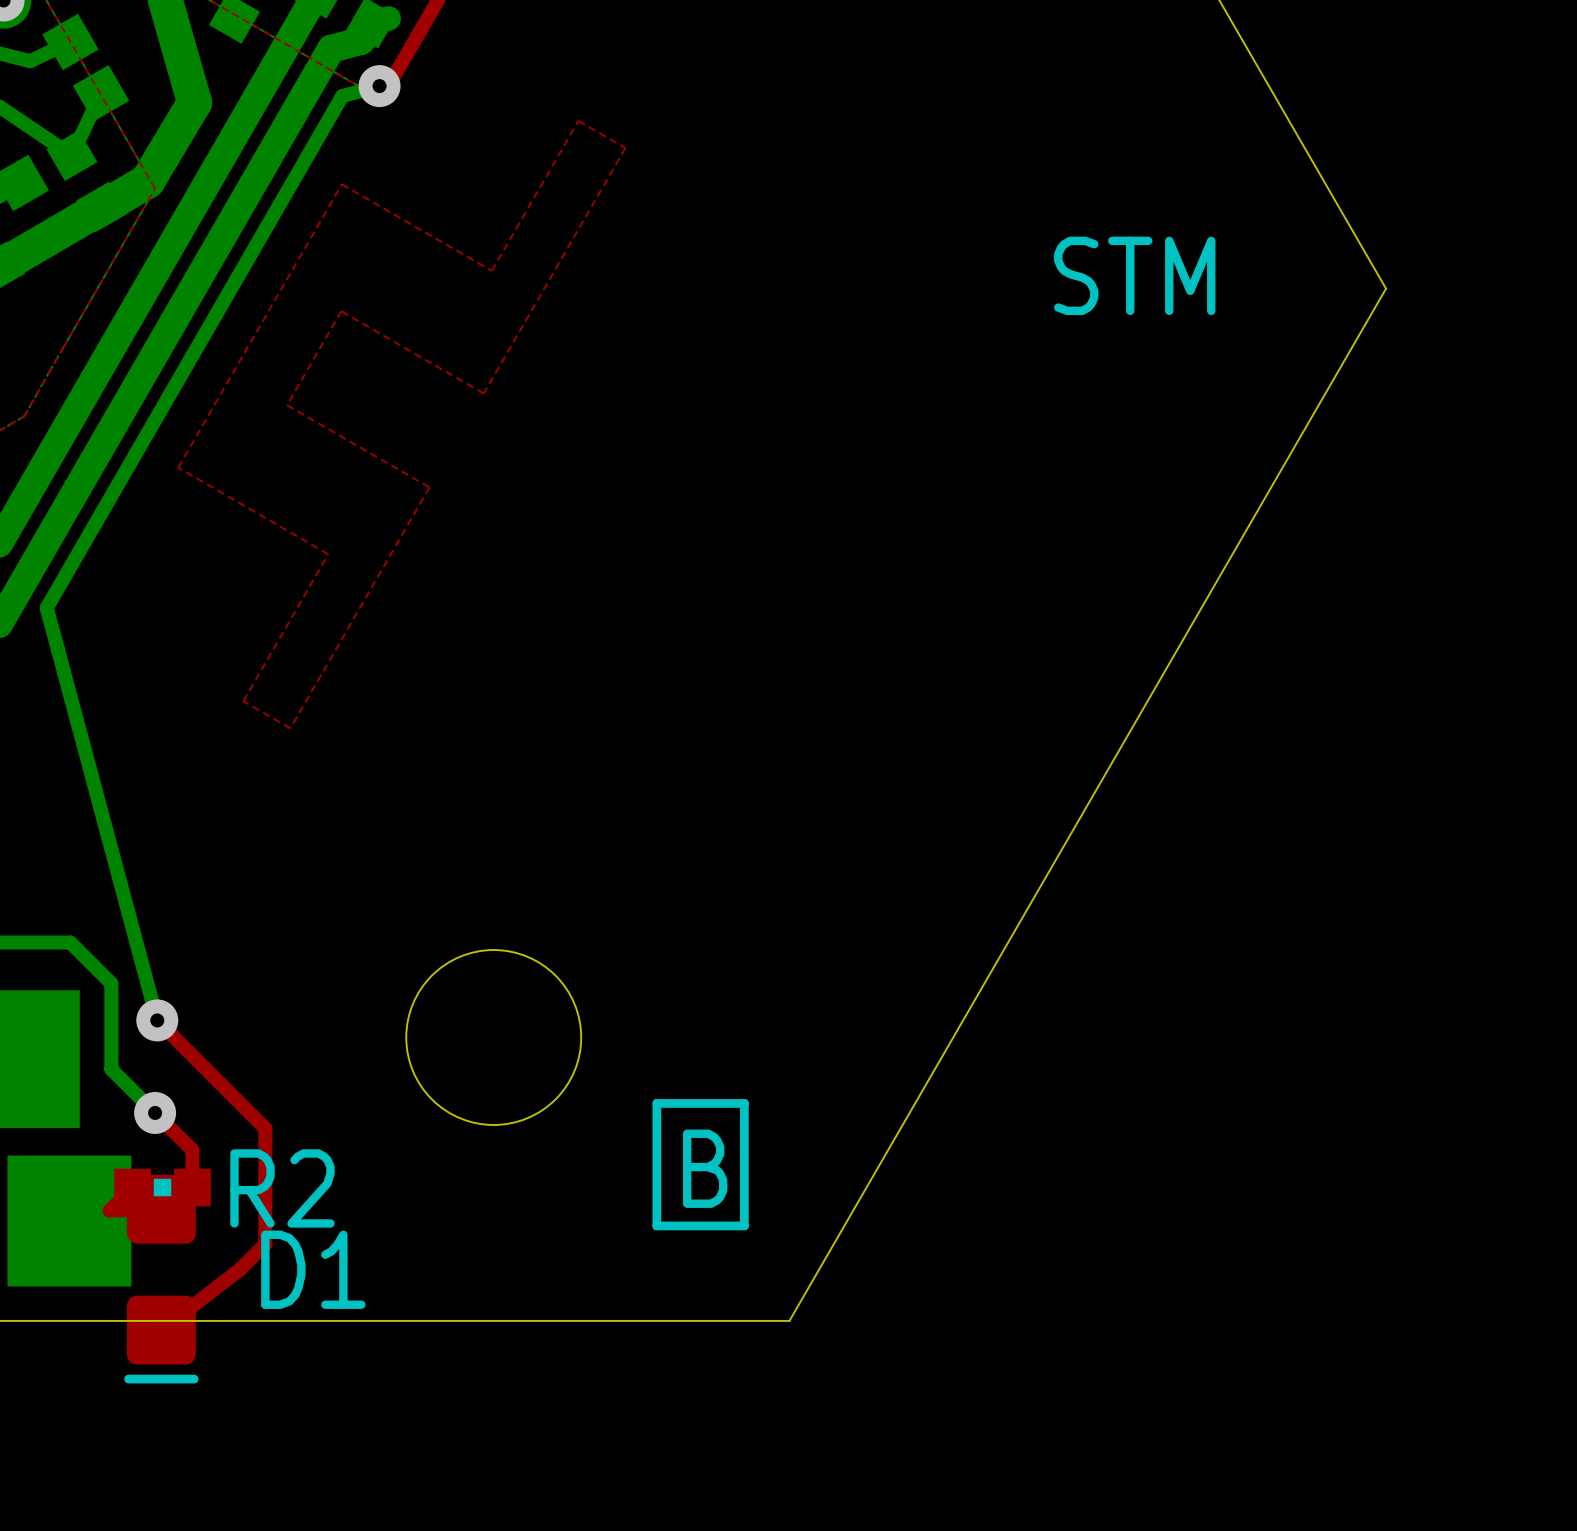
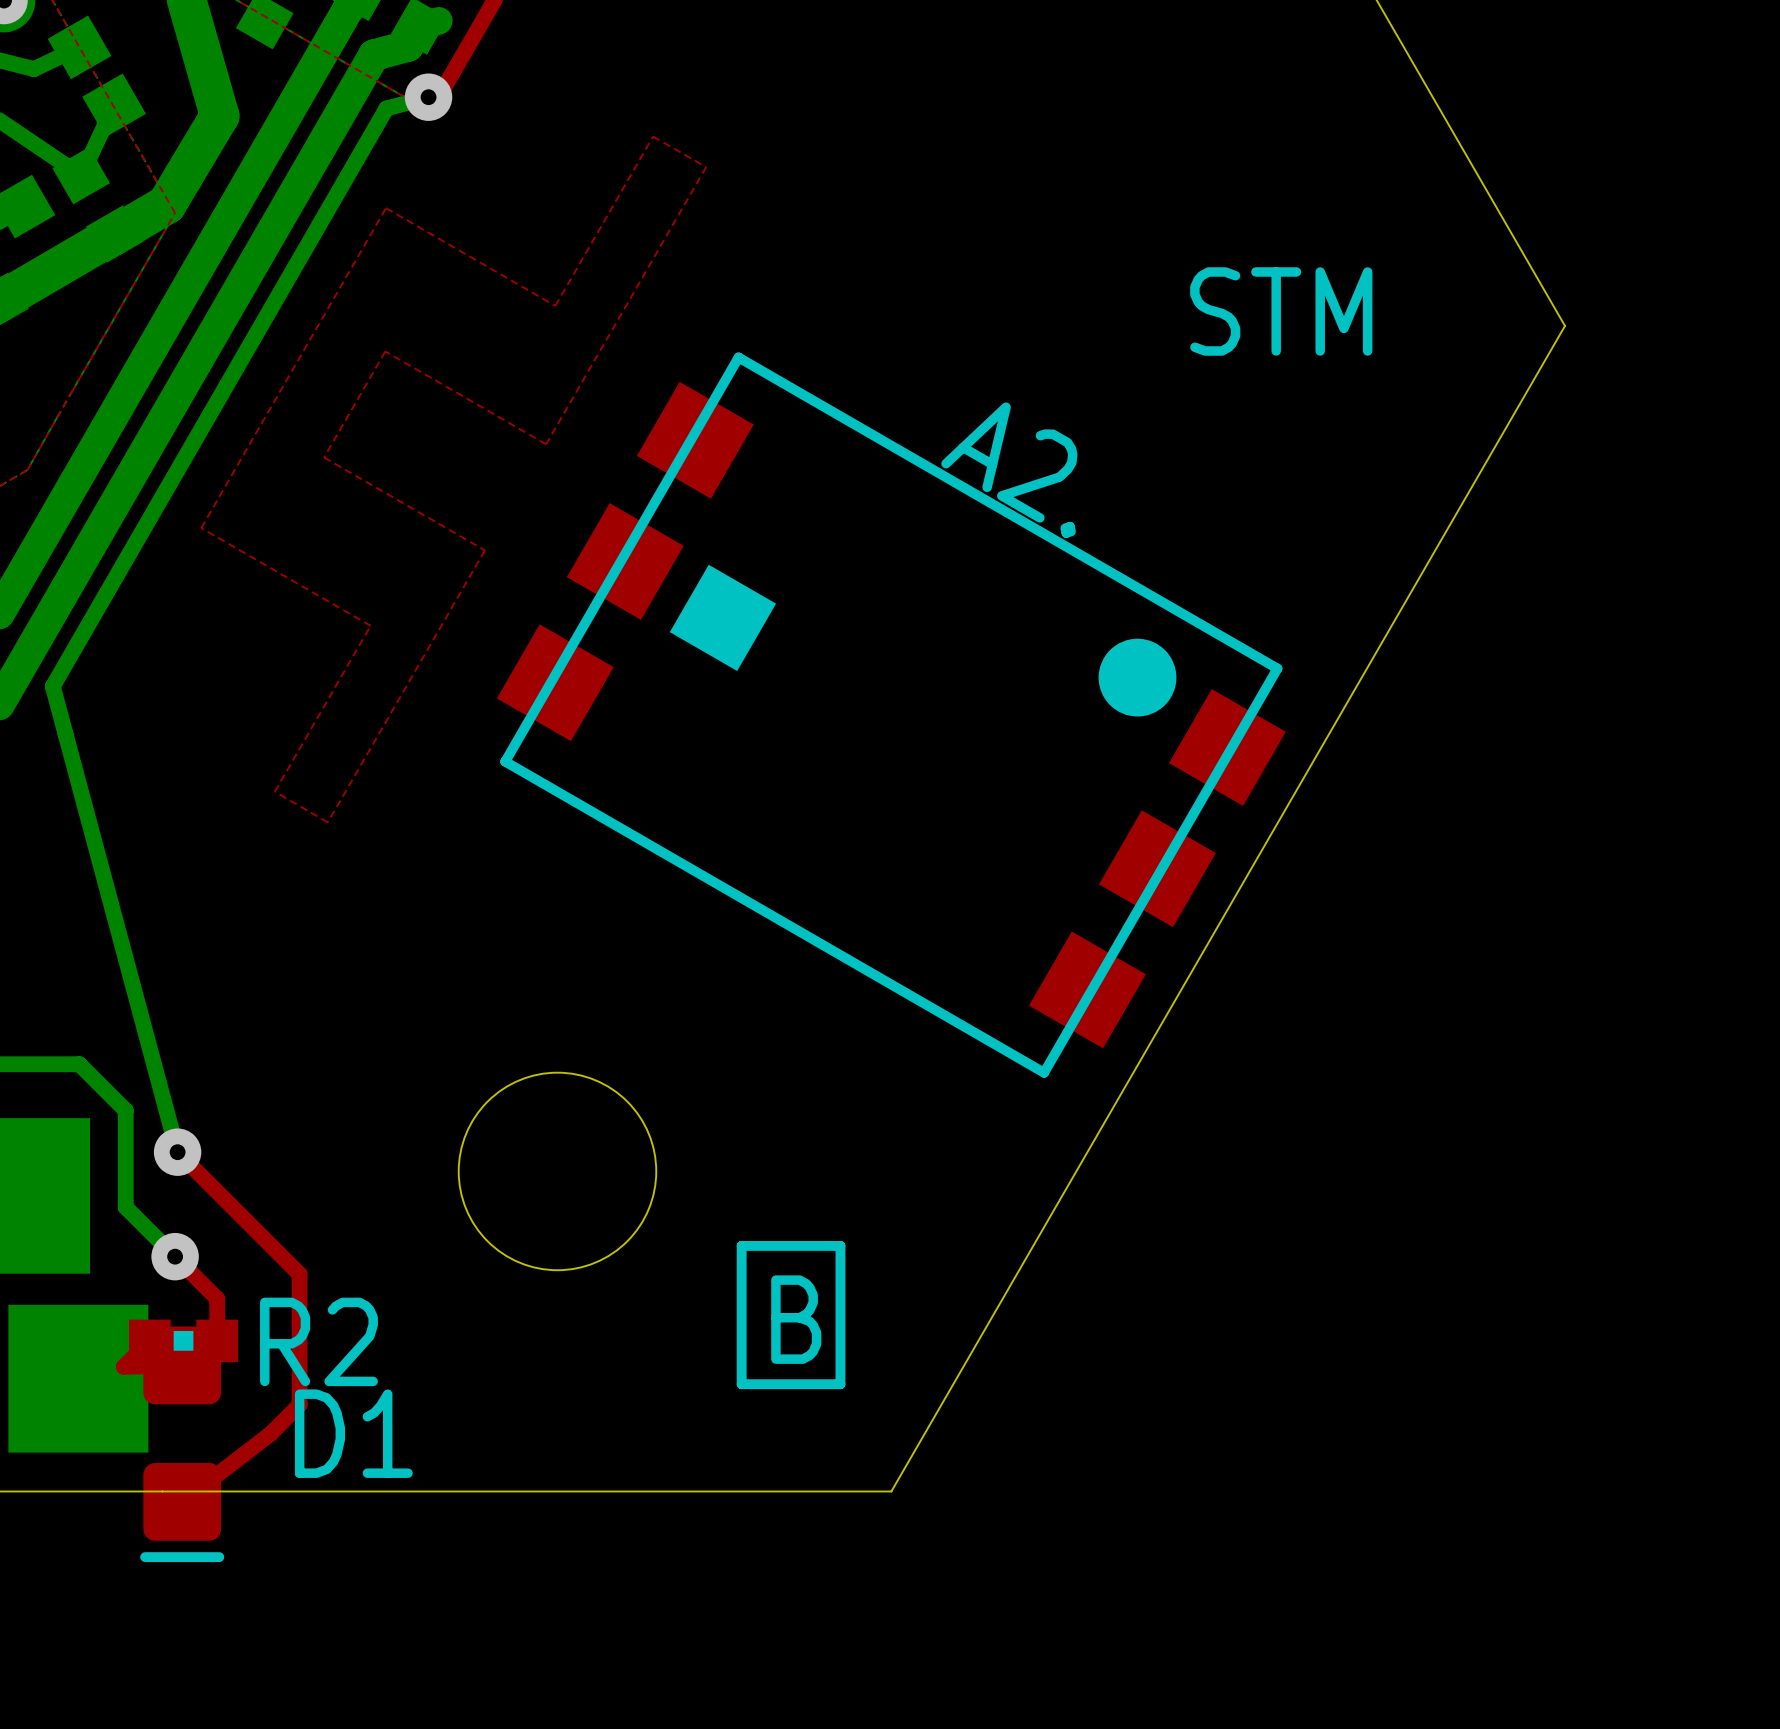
A2.: none -> (891, 715)

